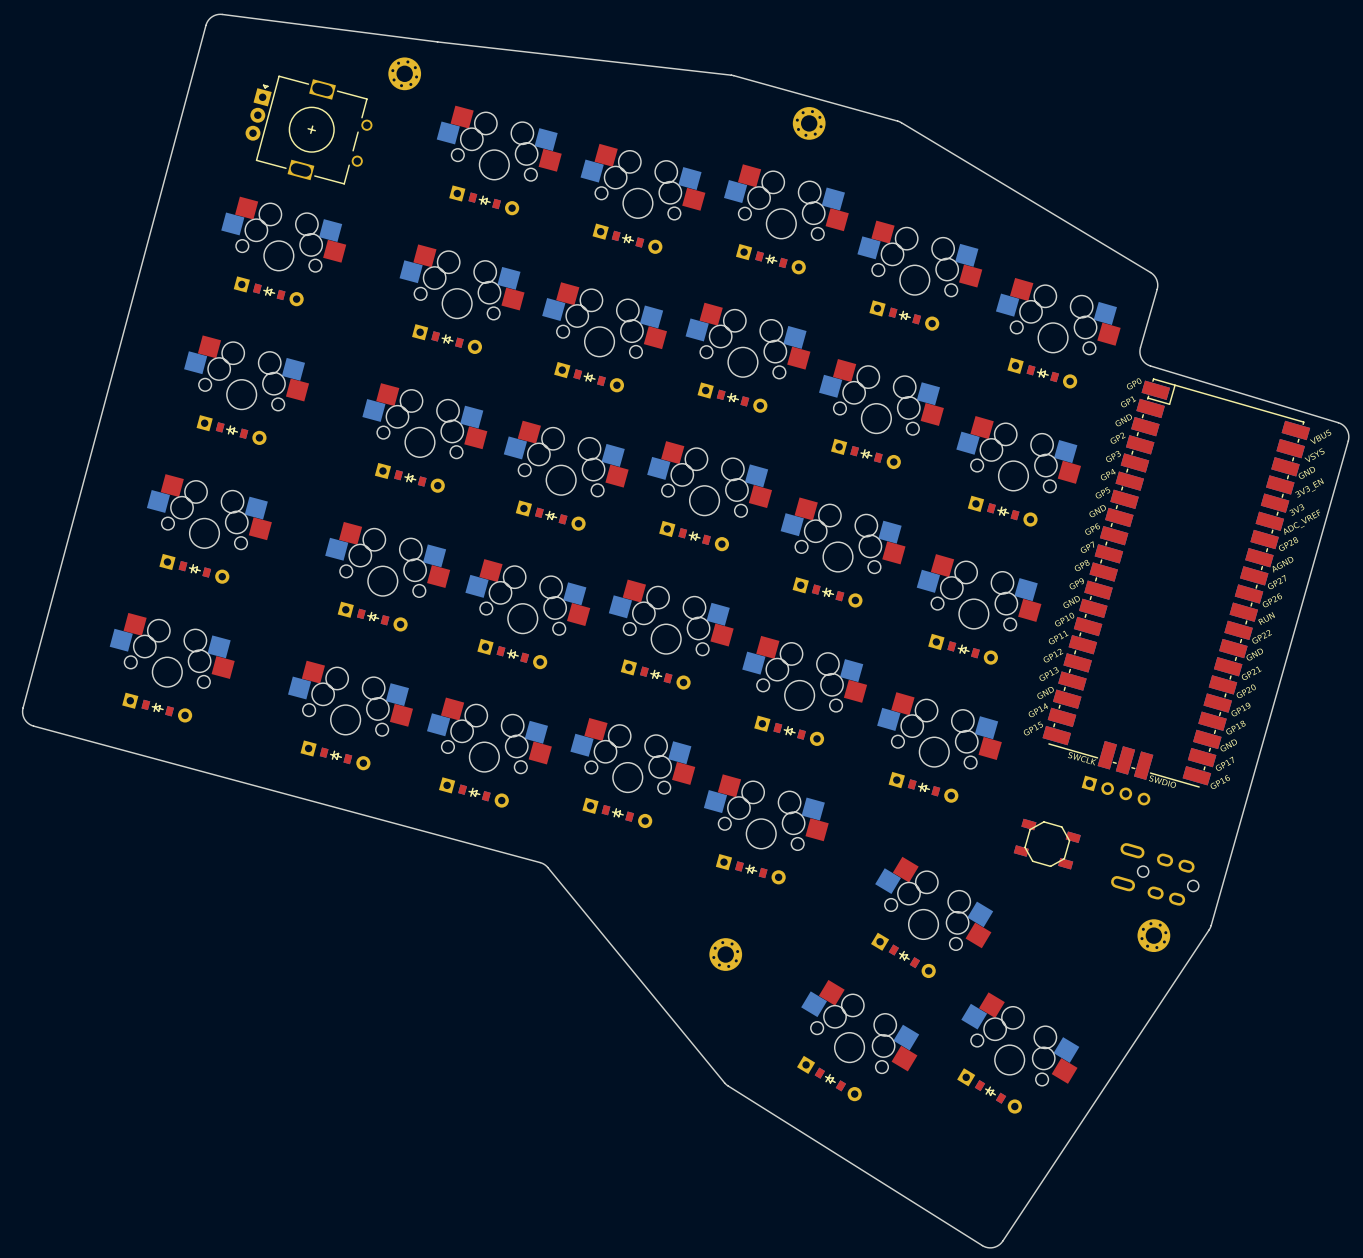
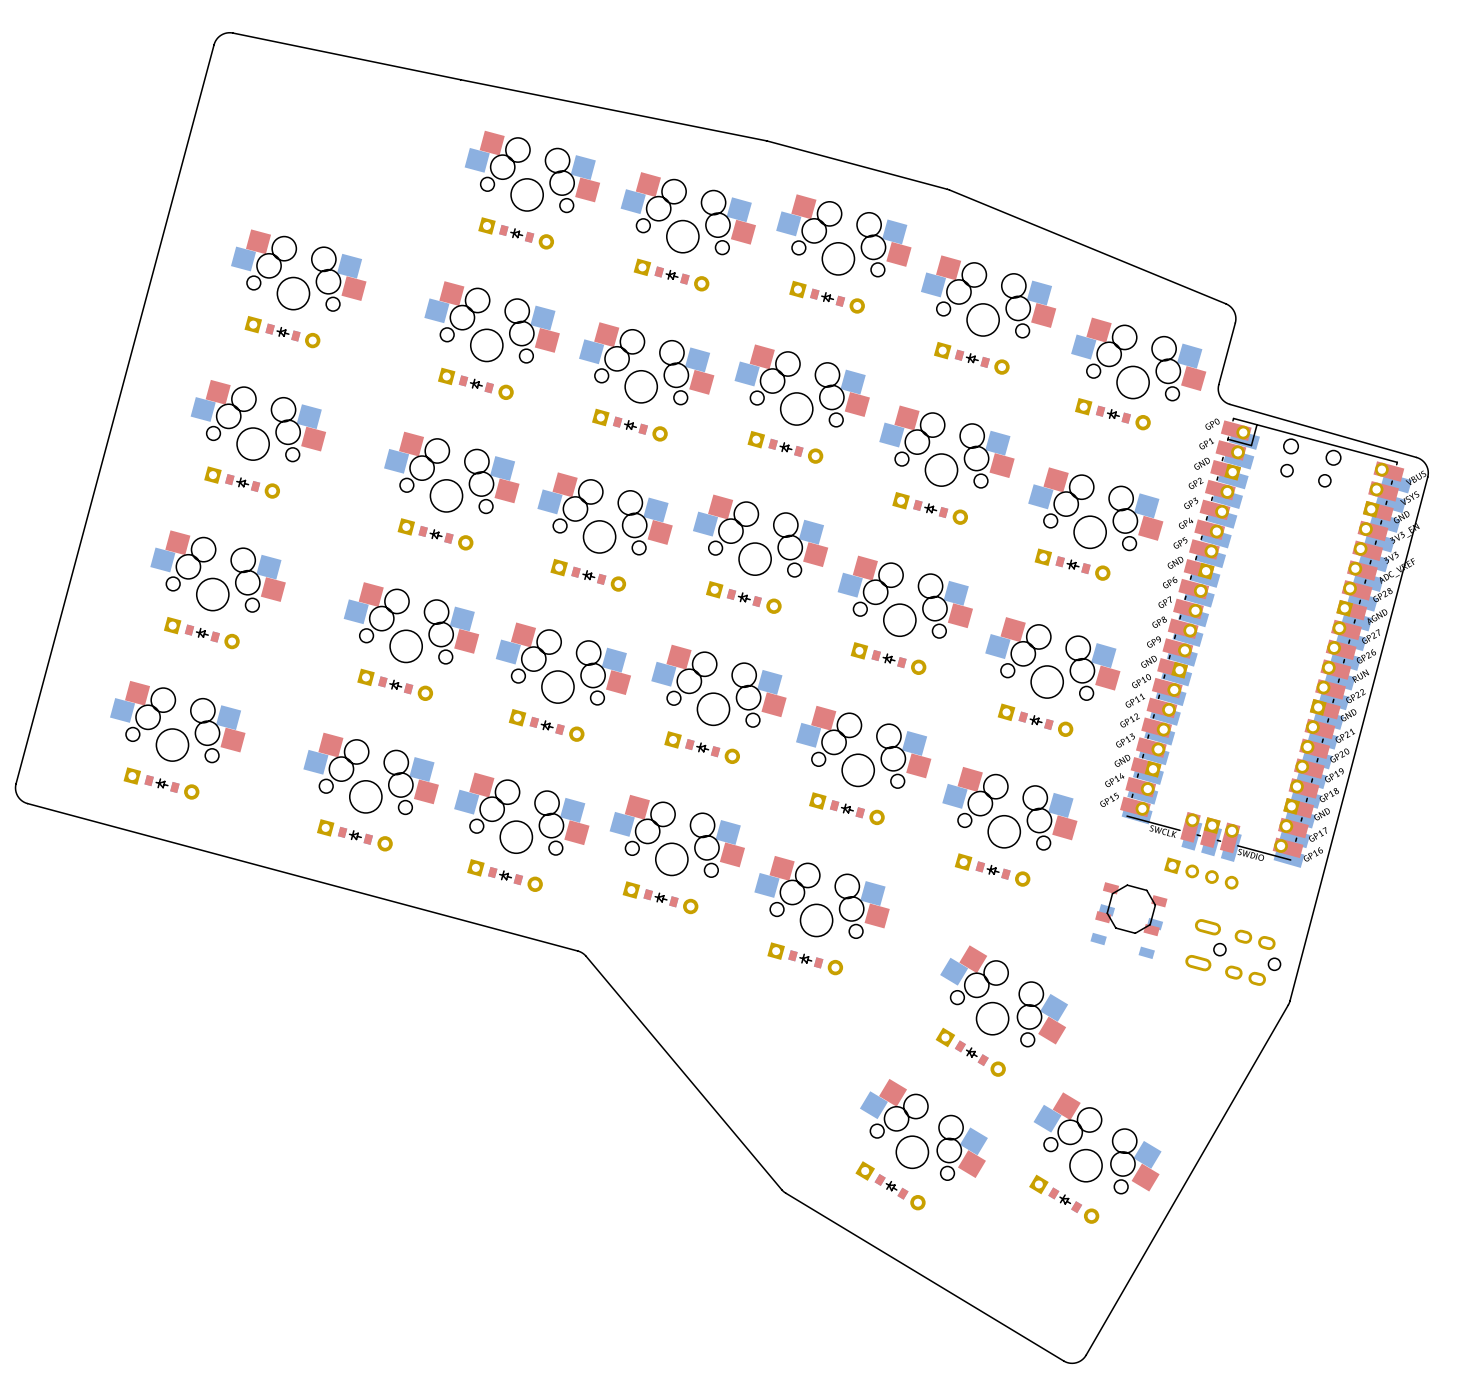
board edge: (205, 26) (212, 16) (222, 14) (437, 41) (731, 75) (898, 121) (1153, 274) (1156, 279) (1157, 287) (1140, 349) (1140, 357) (1145, 363) (1340, 423) (1347, 431) (1348, 441) (1210, 927) (1002, 1241) (993, 1247) (982, 1245) (726, 1084) (543, 863) (33, 726) (24, 719) (23, 707) -> (214, 44) (221, 35) (232, 33) (766, 140) (948, 189) (1229, 305) (1234, 313) (1235, 321) (1218, 388) (1220, 396) (1226, 402) (1422, 460) (1427, 468) (1427, 477) (1290, 1000) (1086, 1355) (1077, 1362) (1068, 1363) (783, 1191) (580, 952) (27, 803) (17, 796) (16, 783)
part: (404, 73) -> none
part: (809, 123) -> none
part: (309, 130) -> none
part: none -> (1112, 414)
part: (1042, 373) -> none
part: none -> (1072, 564)
part: (1002, 511) -> none
part: none -> (1262, 639)
part: (1176, 583) -> none
part: none -> (1131, 909)
part: (1047, 844) -> none
part: none -> (1232, 952)
part: (1154, 874) -> none
part: (1153, 935) -> none
part: (725, 954) -> none

